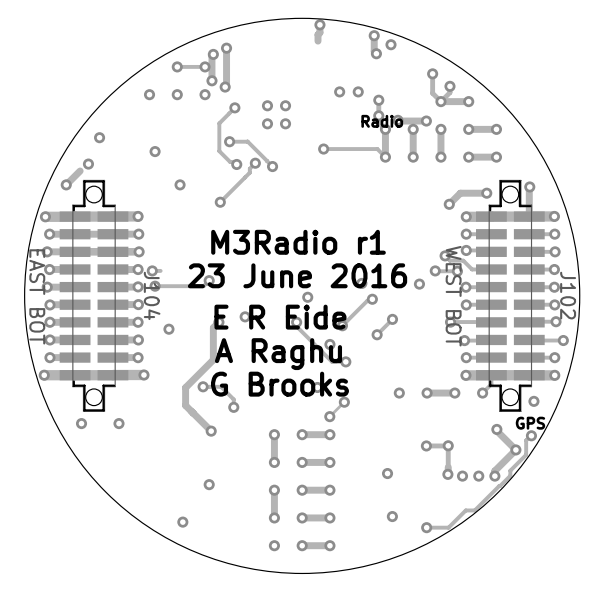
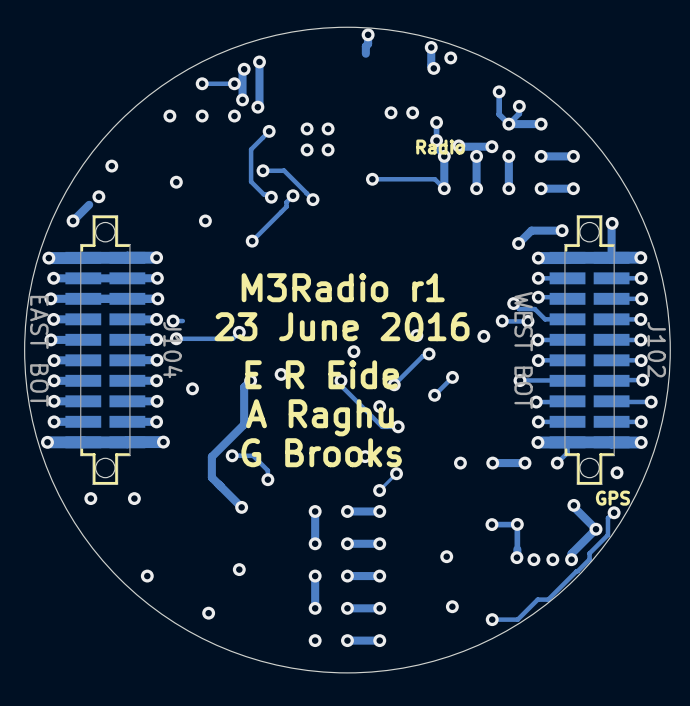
via: none -> (147, 576)

